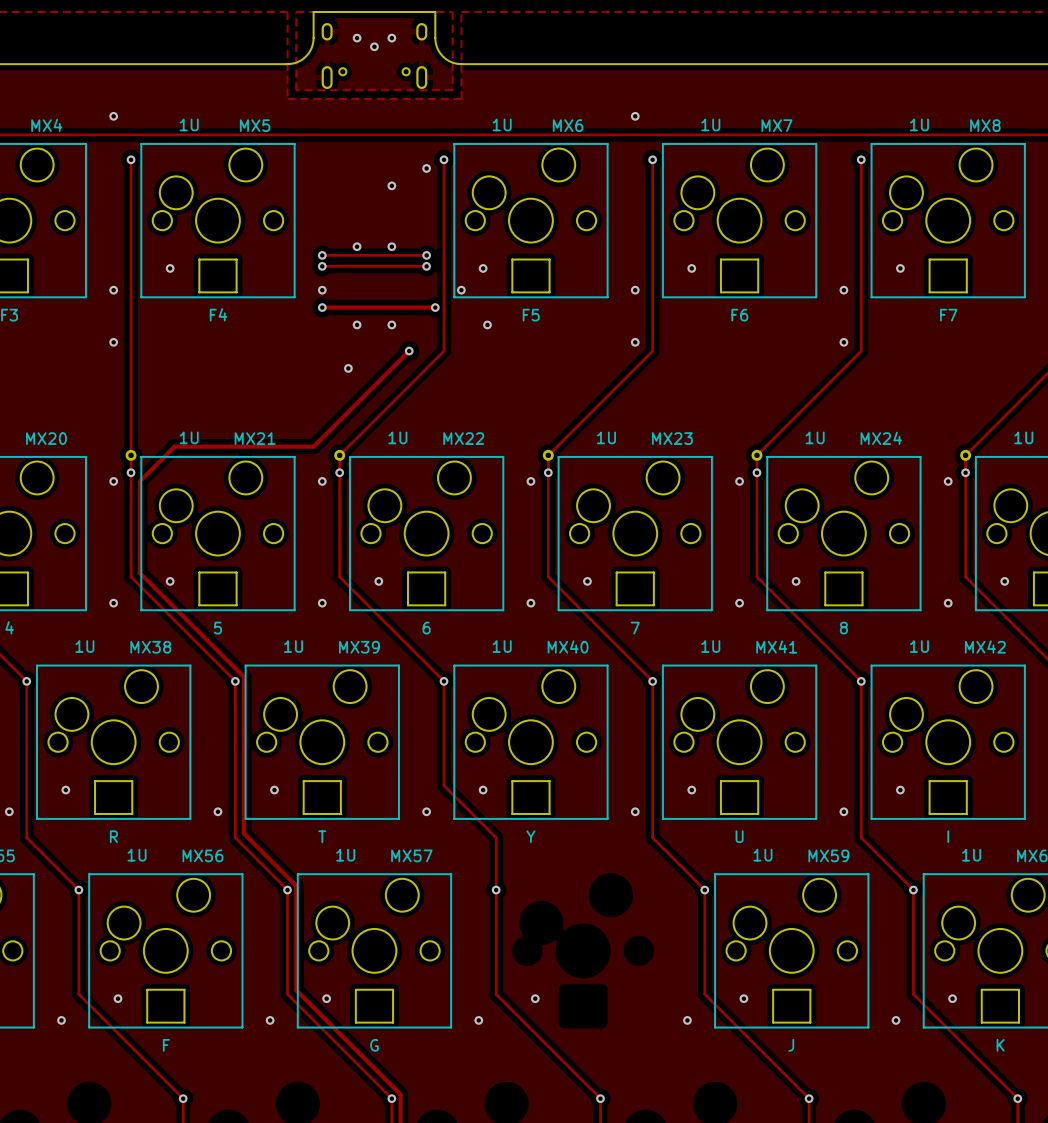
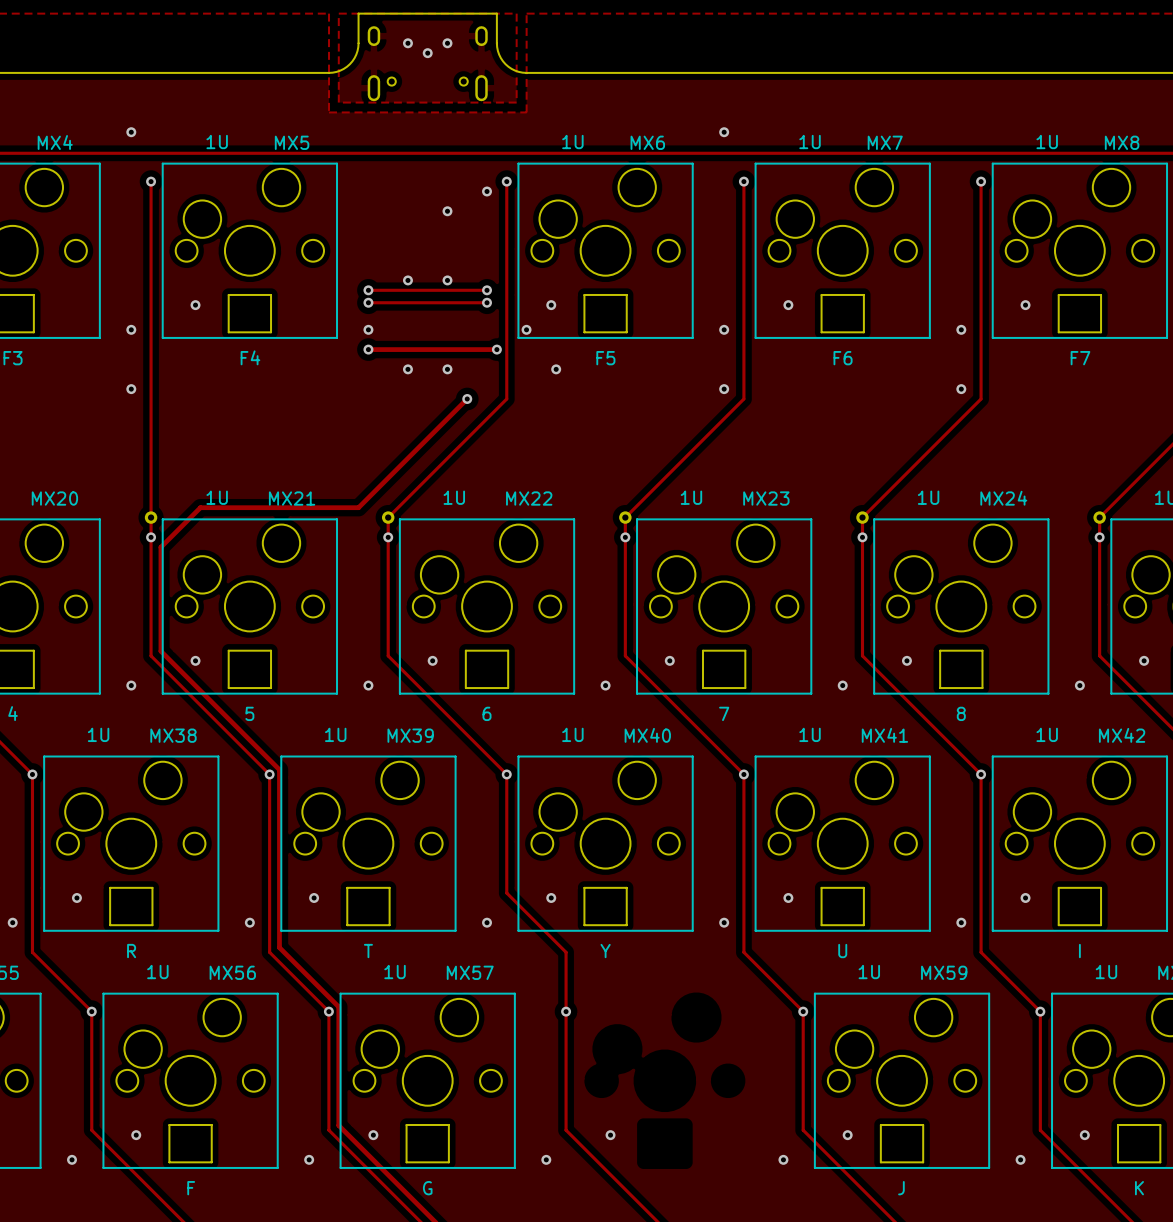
via: (348, 368) -> none
via: (113, 481) -> none
via: (322, 481) -> none
via: (530, 481) -> none
via: (739, 481) -> none
via: (948, 481) -> none

